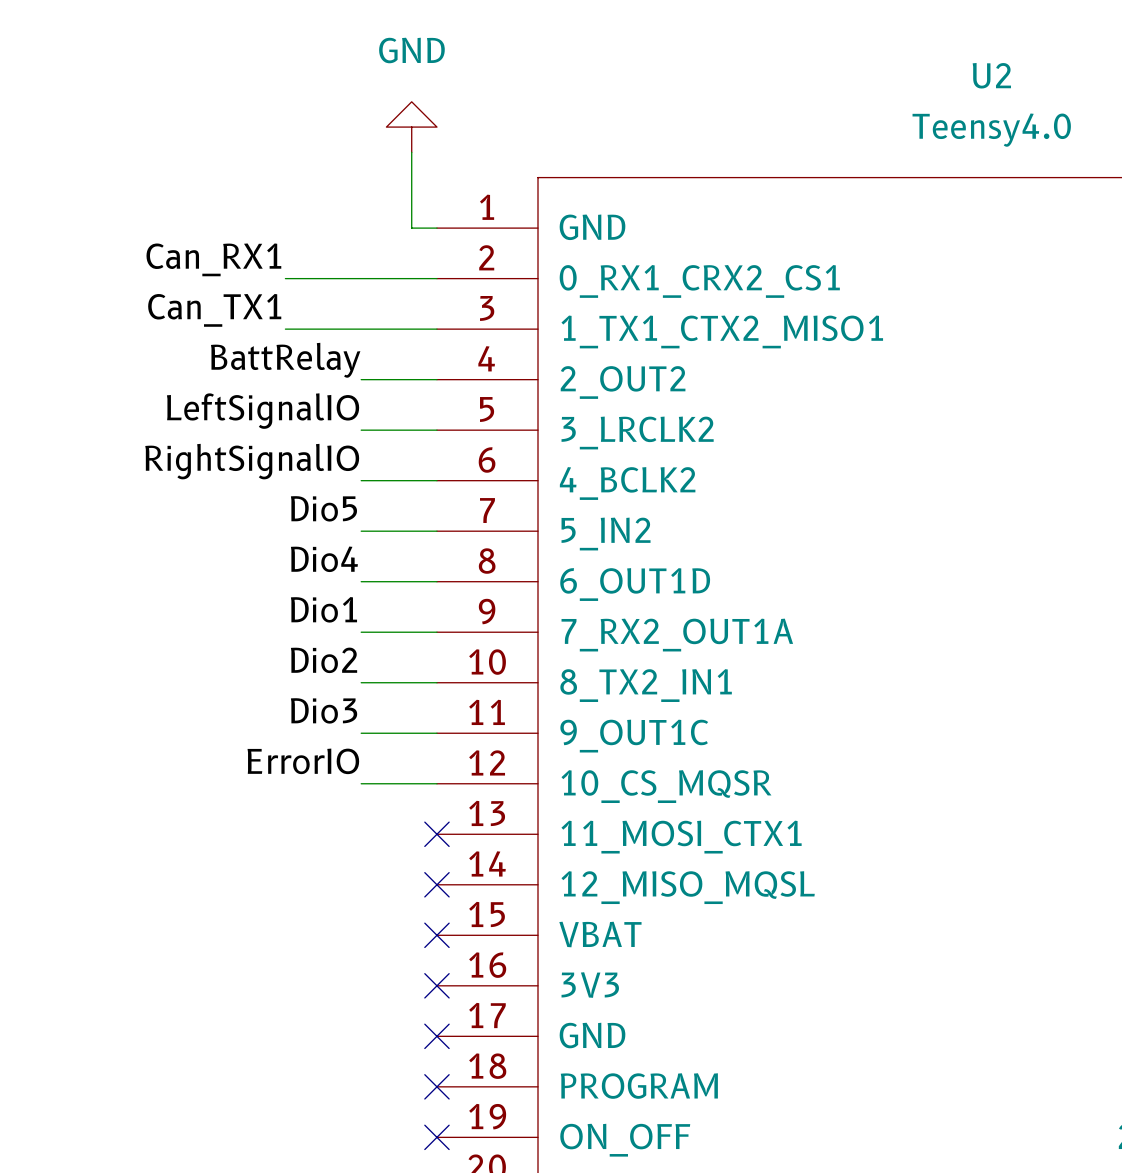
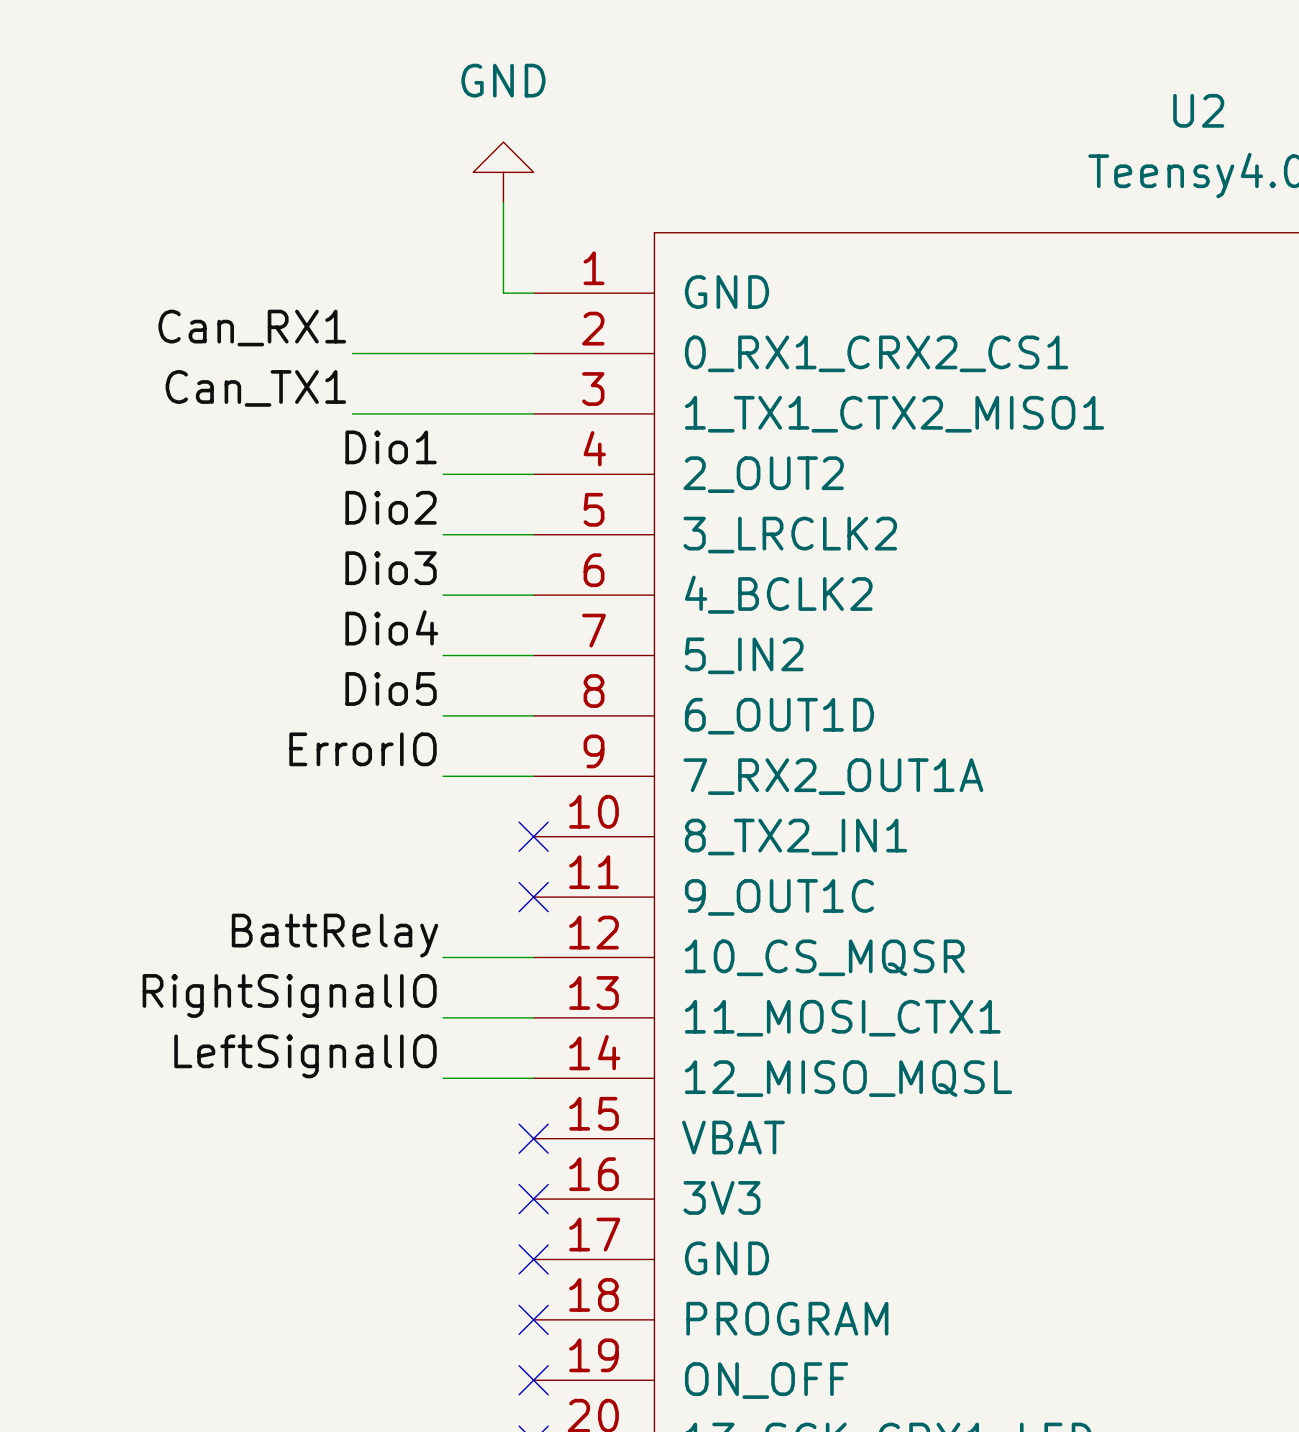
label: BattRelay (285, 360) -> Dio1 (391, 447)
label: LeftSignalIO (263, 411) -> Dio2 (391, 507)
label: RightSignalIO (252, 461) -> Dio3 (391, 568)
label: Dio5 (323, 508) -> Dio4 (391, 627)
label: Dio4 (324, 559) -> Dio5 (391, 688)
label: Dio1 (323, 609) -> ErrorIO (363, 749)
label: Dio2 (324, 660) -> none
wire: (361, 682) (436, 682) -> (443, 1017) (533, 1017)
no-connect mark: none -> (533, 836)
label: Dio3 (324, 710) -> none
wire: (361, 733) (436, 733) -> (443, 1078) (533, 1078)
no-connect mark: none -> (533, 897)
label: ErrorIO (303, 761) -> BattRelay (334, 935)
label: none -> RightSignalIO (289, 995)
no-connect mark: (436, 834) -> none
label: none -> LeftSignalIO (305, 1056)
no-connect mark: (436, 884) -> none

